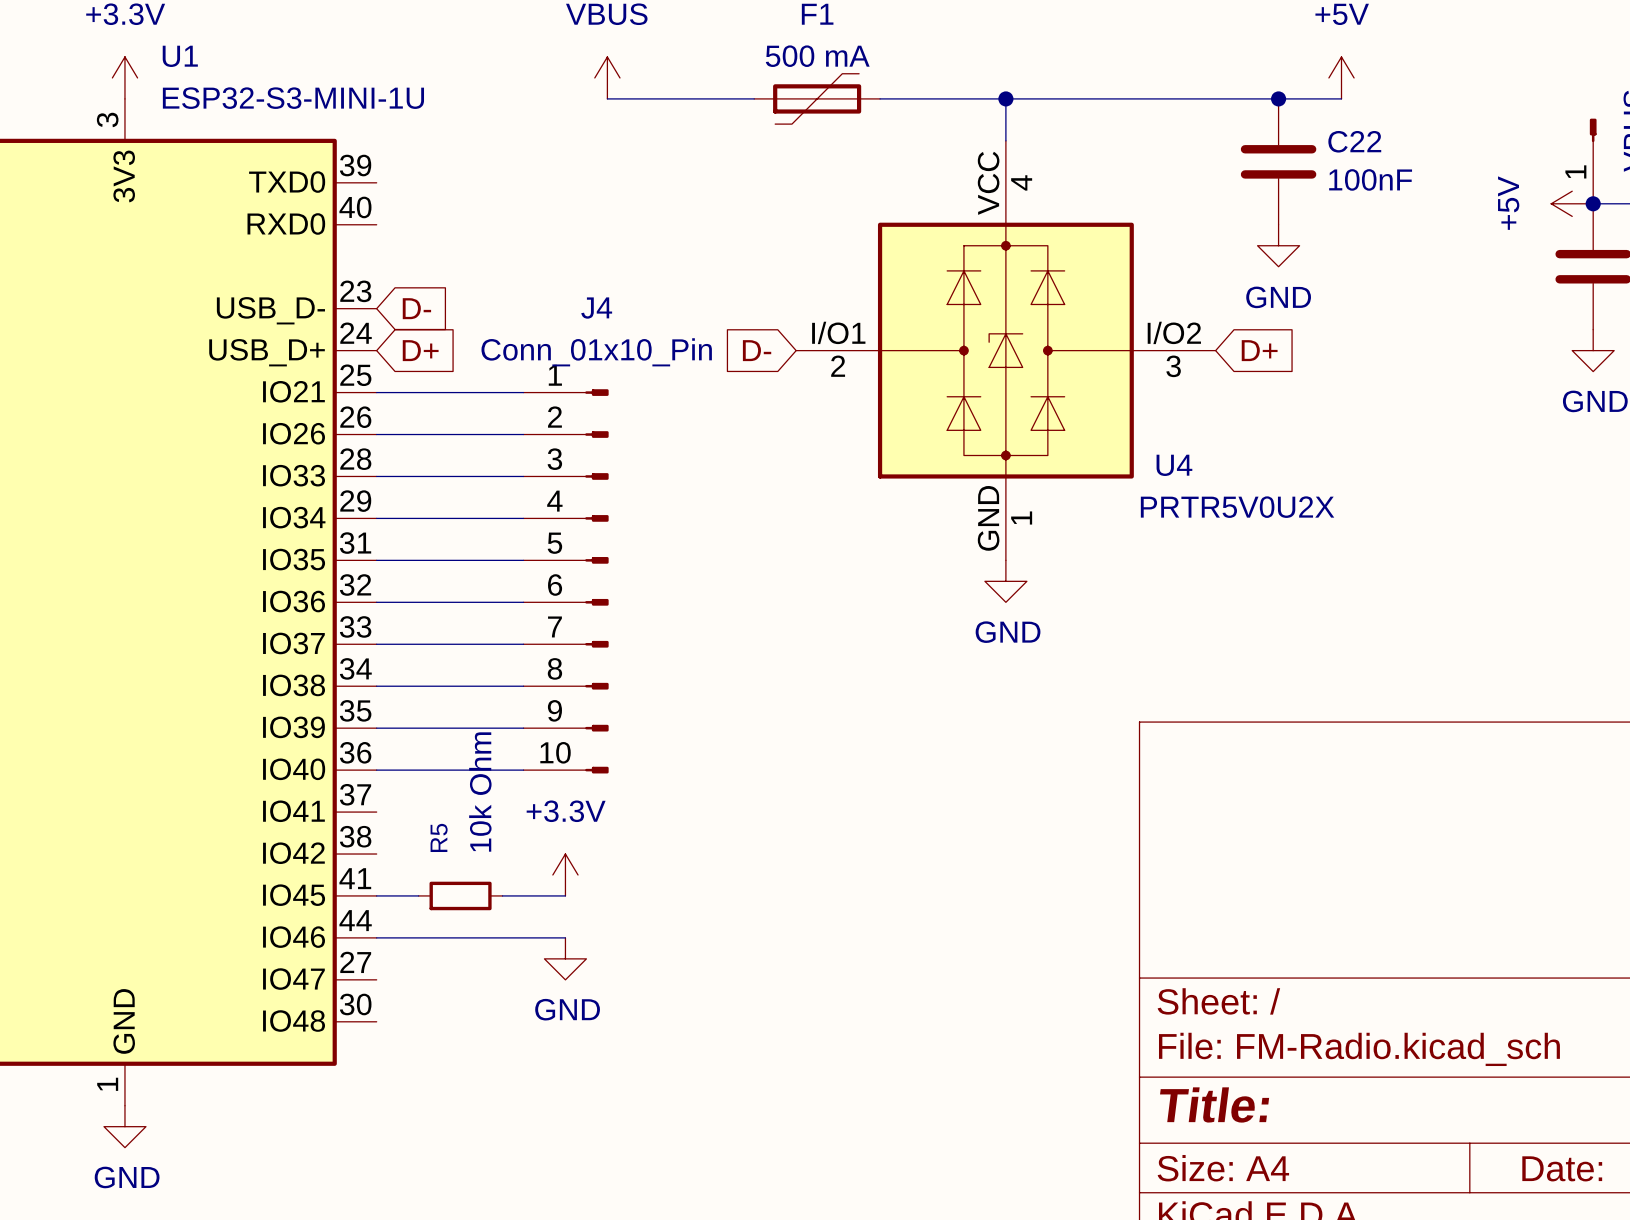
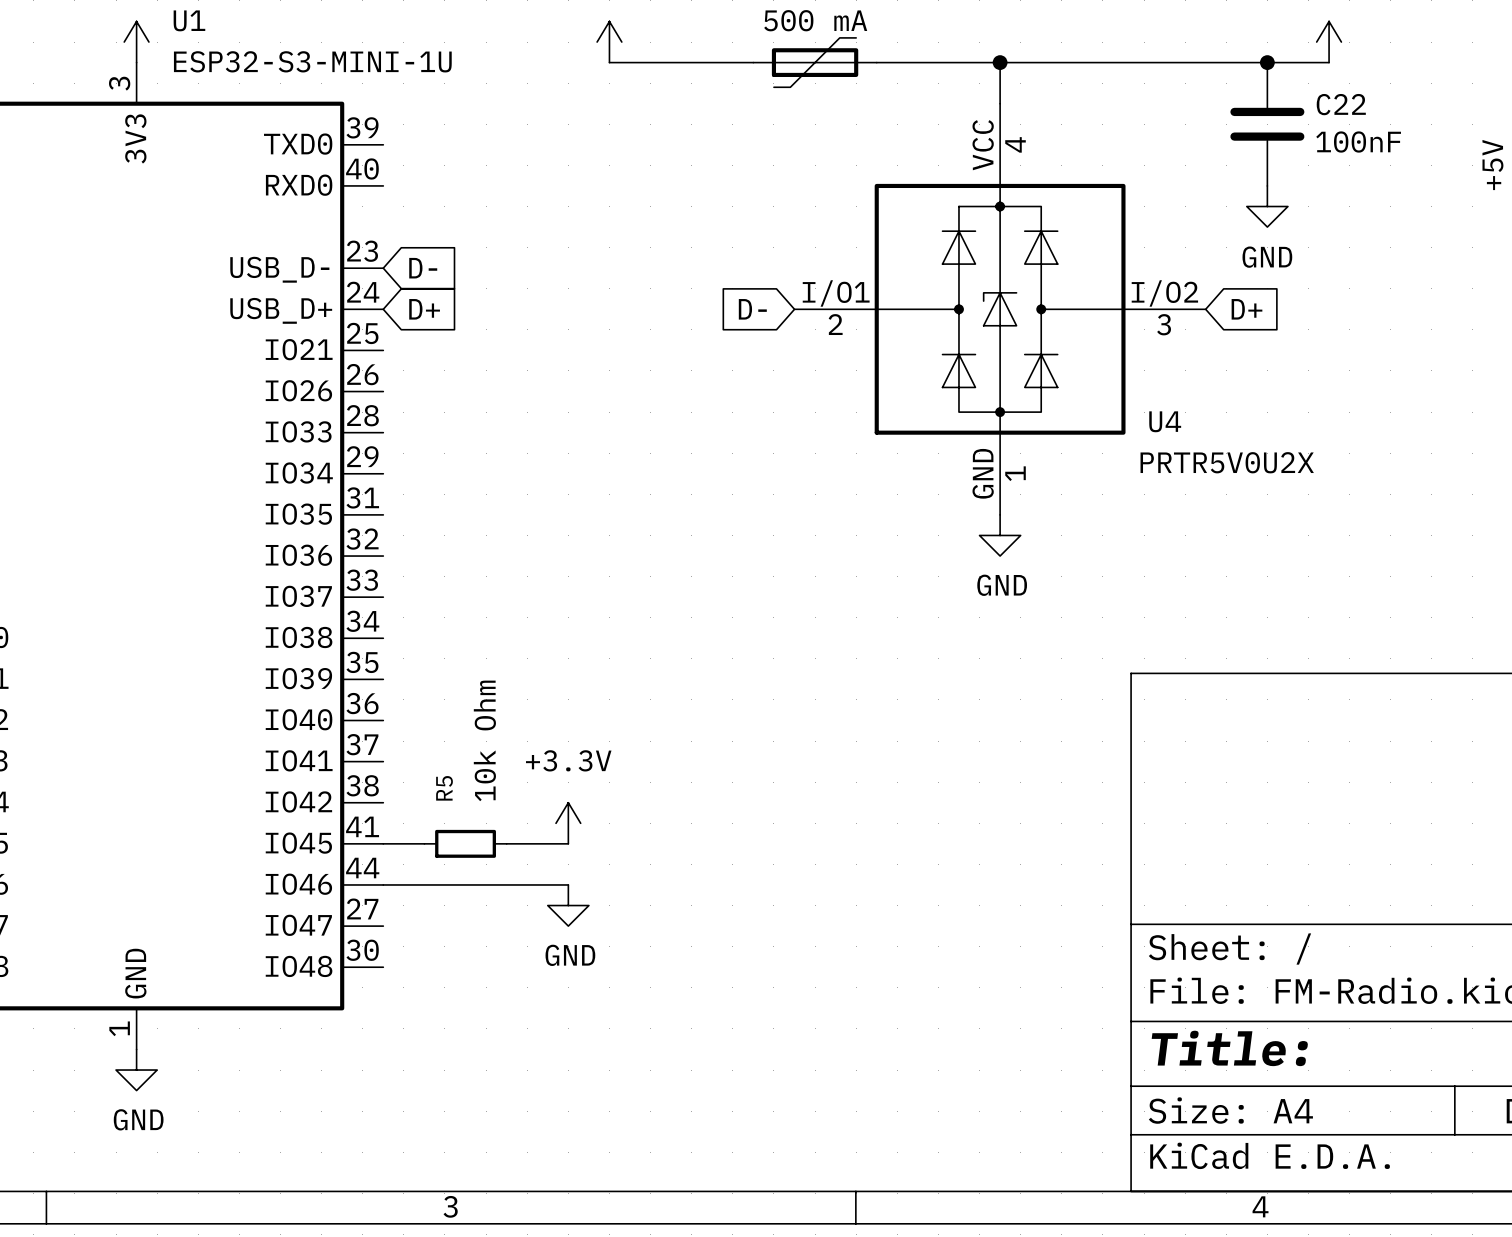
wire: (376, 392) (523, 392) -> none
wire: (376, 434) (523, 434) -> none
wire: (376, 476) (523, 476) -> none
wire: (376, 518) (523, 518) -> none
wire: (376, 560) (523, 560) -> none
J4: Conn_01x10_Pin (566, 581) -> none
wire: (376, 602) (523, 602) -> none
wire: (376, 644) (523, 644) -> none
wire: (376, 686) (523, 686) -> none
wire: (376, 728) (523, 728) -> none
wire: (376, 770) (523, 770) -> none

